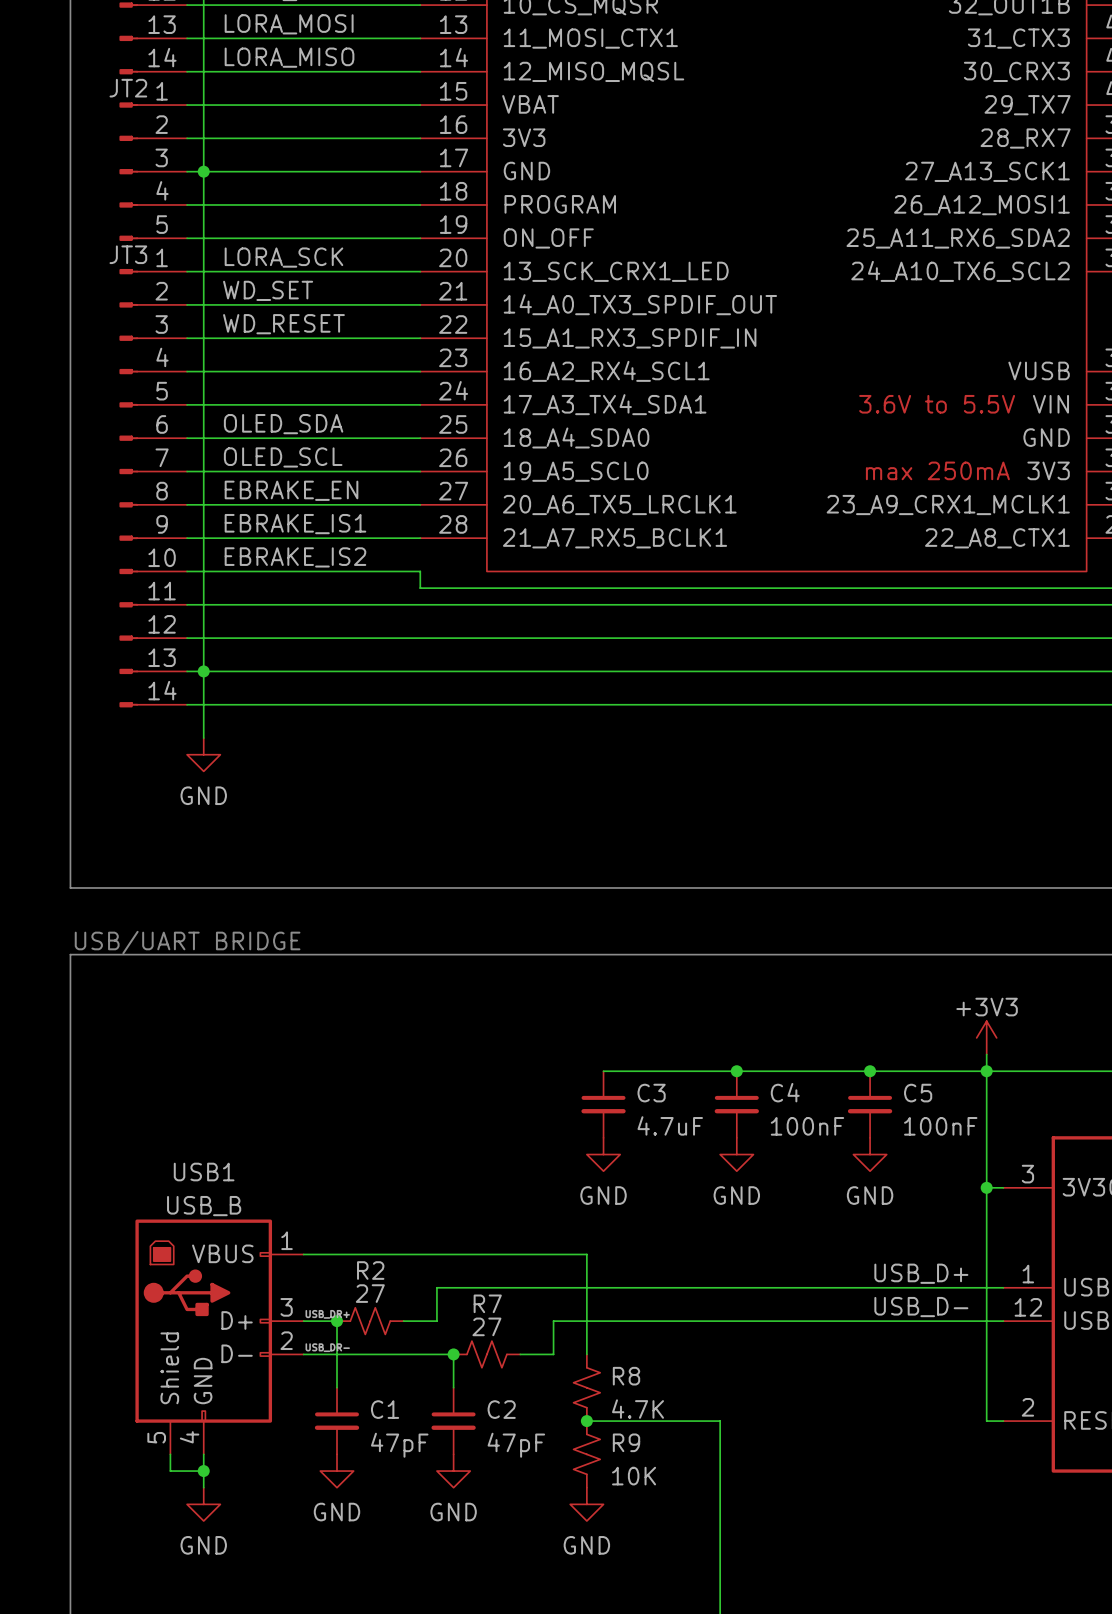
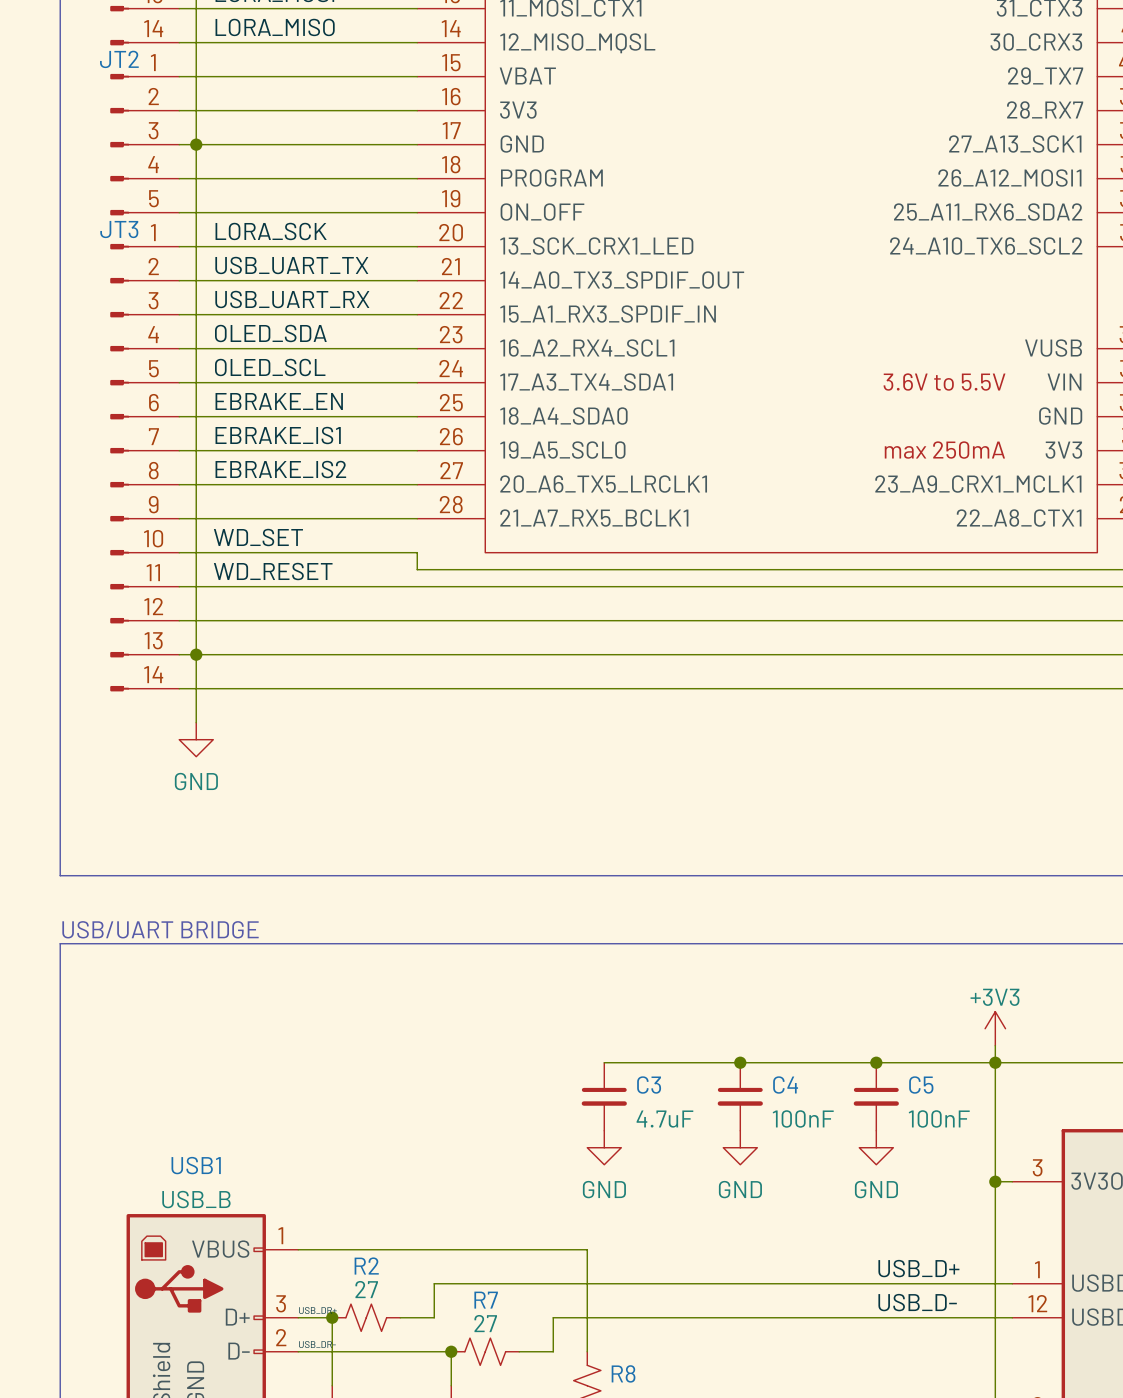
label: WD_SET (268, 290) -> USB_UART_TX (291, 265)
label: WD_RESET (283, 324) -> USB_UART_RX (292, 299)
label: none -> OLED_SDA (270, 333)
label: none -> OLED_SCL (270, 367)
label: OLED_SDA (283, 424) -> EBRAKE_EN (279, 401)
label: OLED_SCL (283, 457) -> EBRAKE_IS1 (278, 435)
label: EBRAKE_EN (291, 490) -> EBRAKE_IS2 (280, 469)
label: EBRAKE_IS1 (295, 524) -> none
label: EBRAKE_IS2 (295, 557) -> WD_SET (258, 537)
label: none -> WD_RESET (273, 571)

